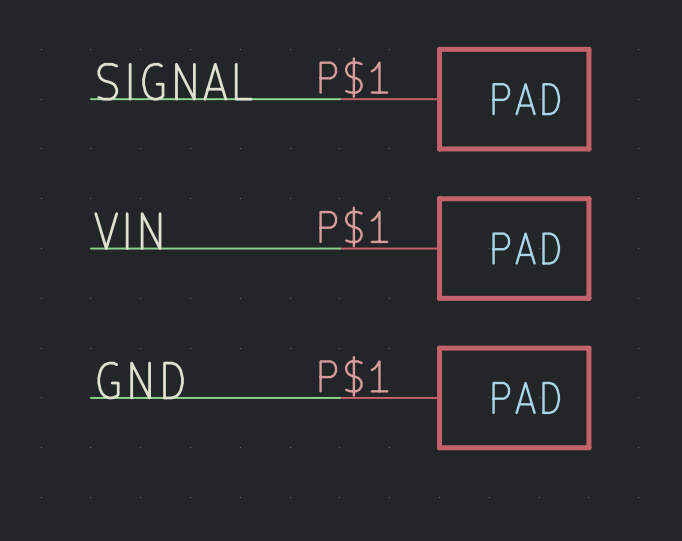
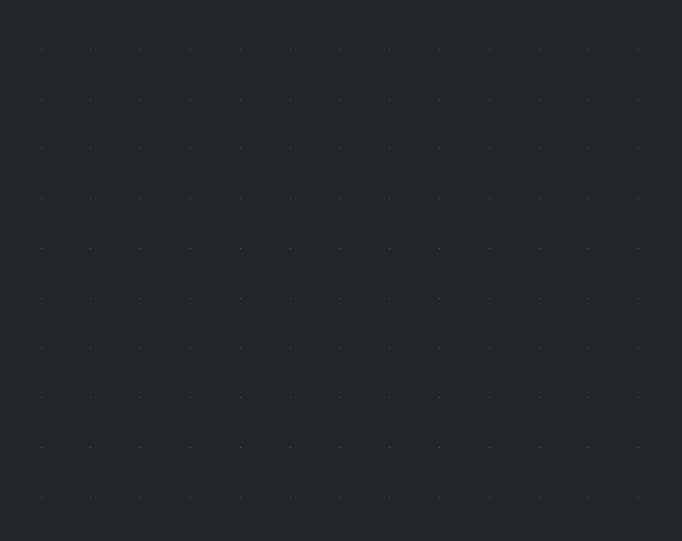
label: SIGNAL (174, 81) -> none
wire: (90, 99) (339, 99) -> none
part: (465, 99) -> none
label: VIN (127, 231) -> none
wire: (90, 248) (339, 248) -> none
part: (465, 248) -> none
label: GND (140, 380) -> none
wire: (90, 397) (339, 397) -> none
part: (465, 397) -> none

